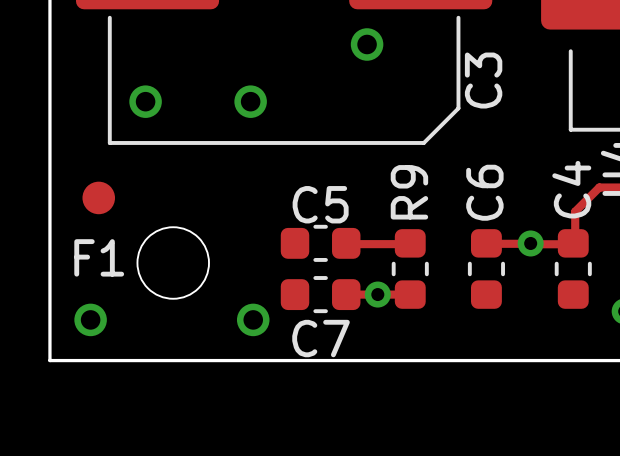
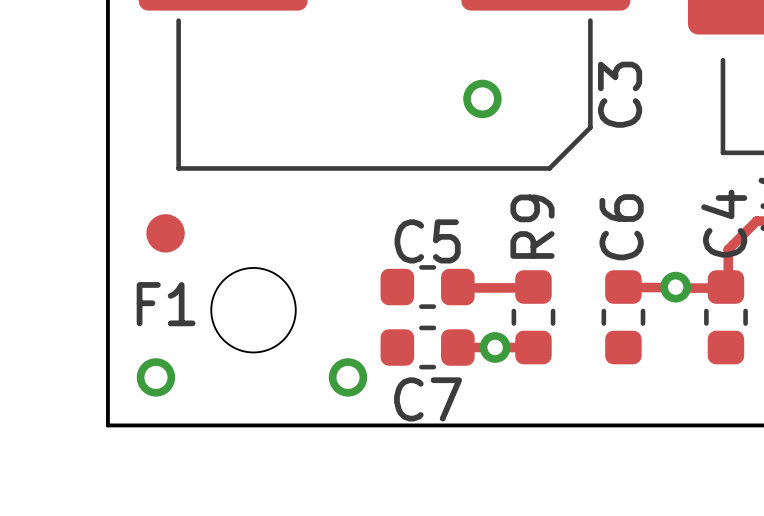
via position: (367, 44) -> (482, 98)
via: (145, 101) -> none
via: (250, 101) -> none

